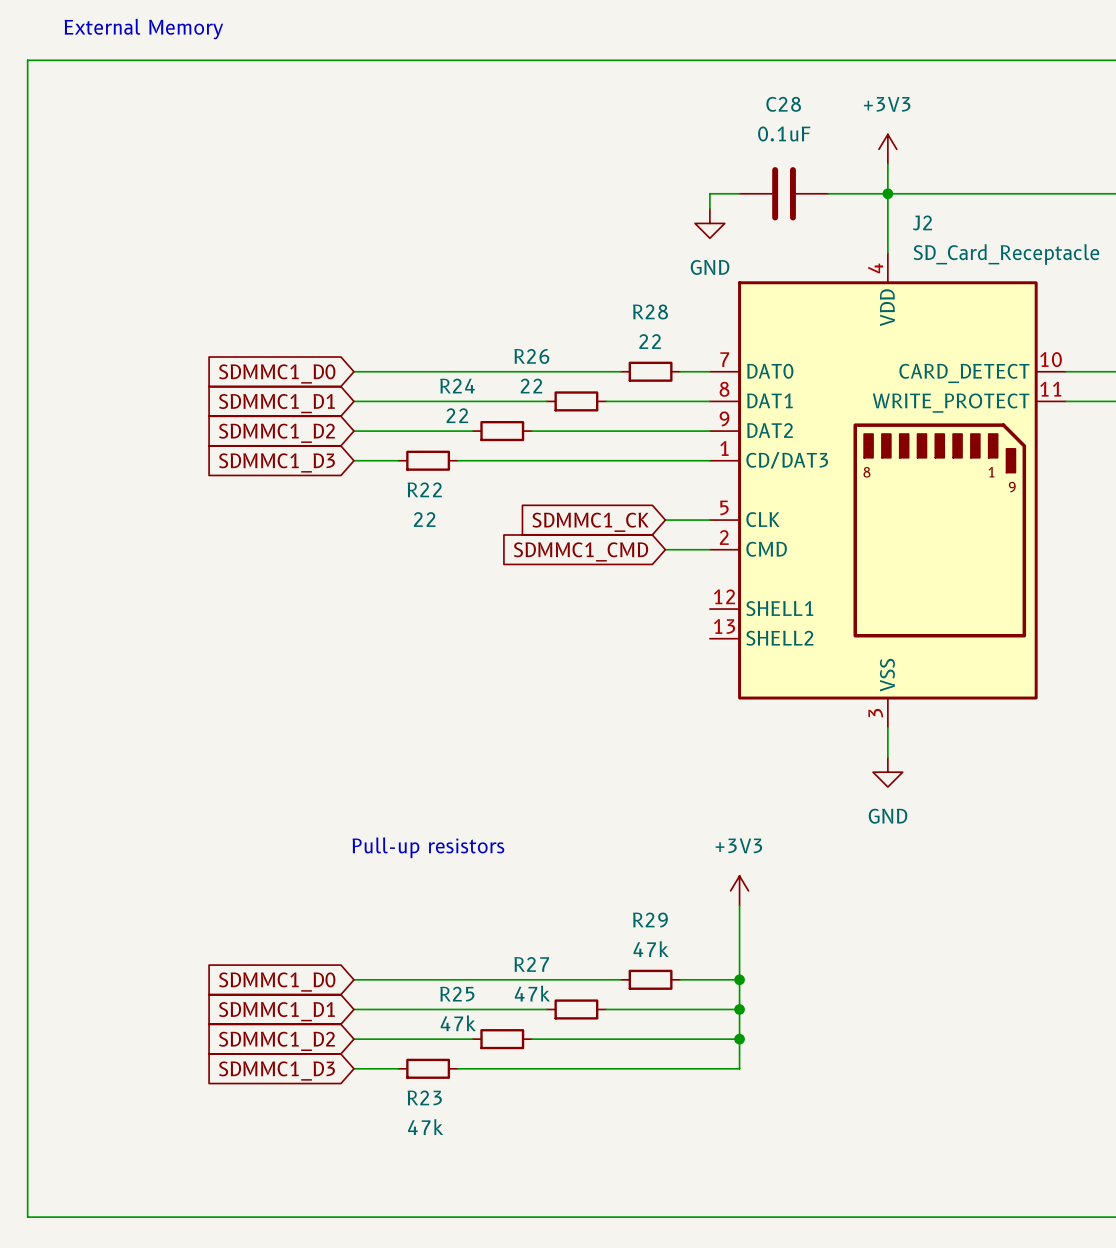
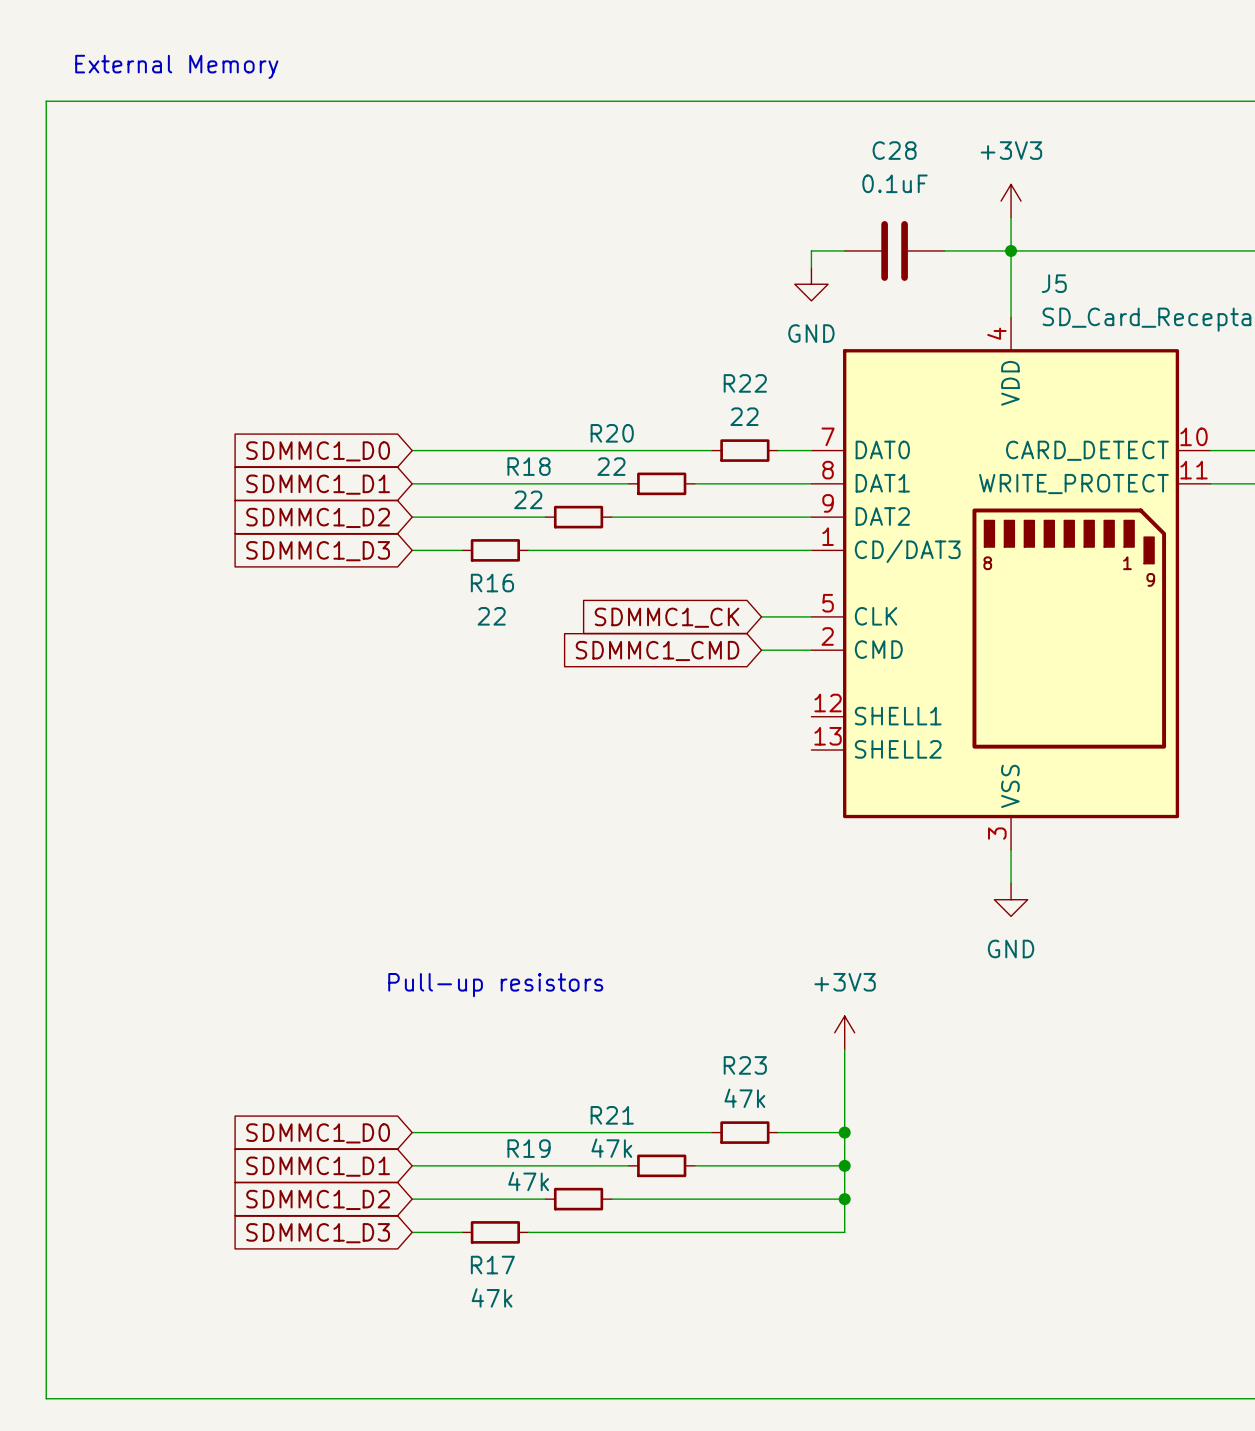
J2 name: J2 (922, 222) -> J5 (1054, 283)
R28 name: R28 (650, 311) -> R22 (745, 383)
R26 name: R26 (531, 356) -> R20 (612, 433)
R24 name: R24 (457, 386) -> R18 (529, 466)
R22 name: R22 (424, 489) -> R16 (492, 583)
R29 name: R29 (650, 920) -> R23 (745, 1065)
R27 name: R27 (531, 964) -> R21 (612, 1115)
R25 name: R25 (457, 994) -> R19 (529, 1148)
R23 name: R23 (424, 1097) -> R17 (492, 1265)

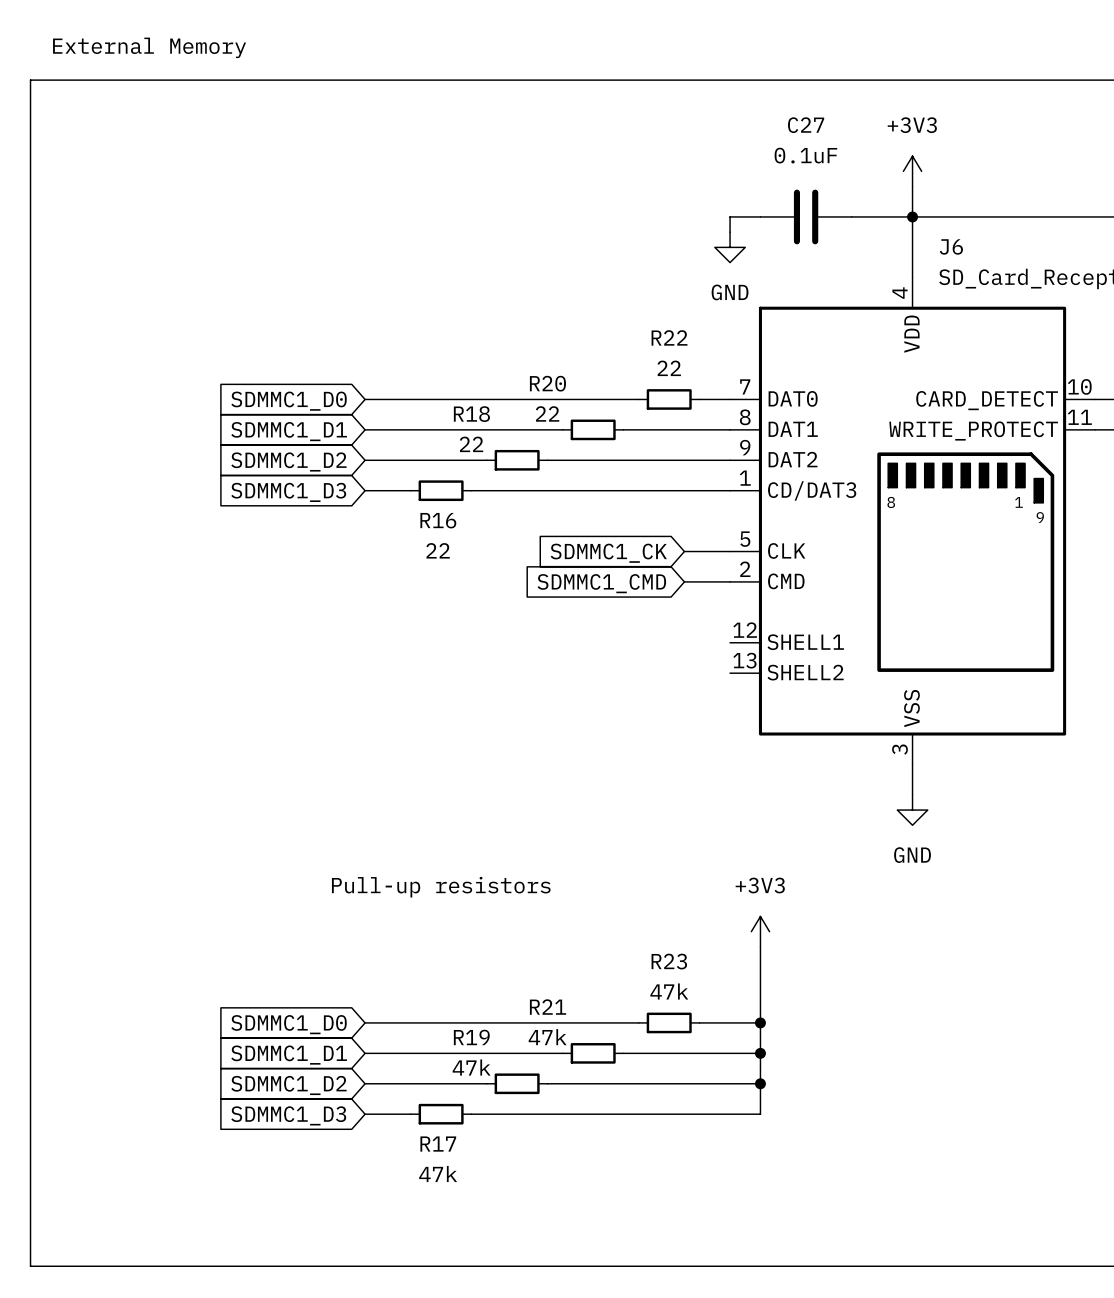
C28 name: C28 (894, 150) -> C27 (806, 125)
J5 name: J5 (1054, 283) -> J6 (951, 246)

